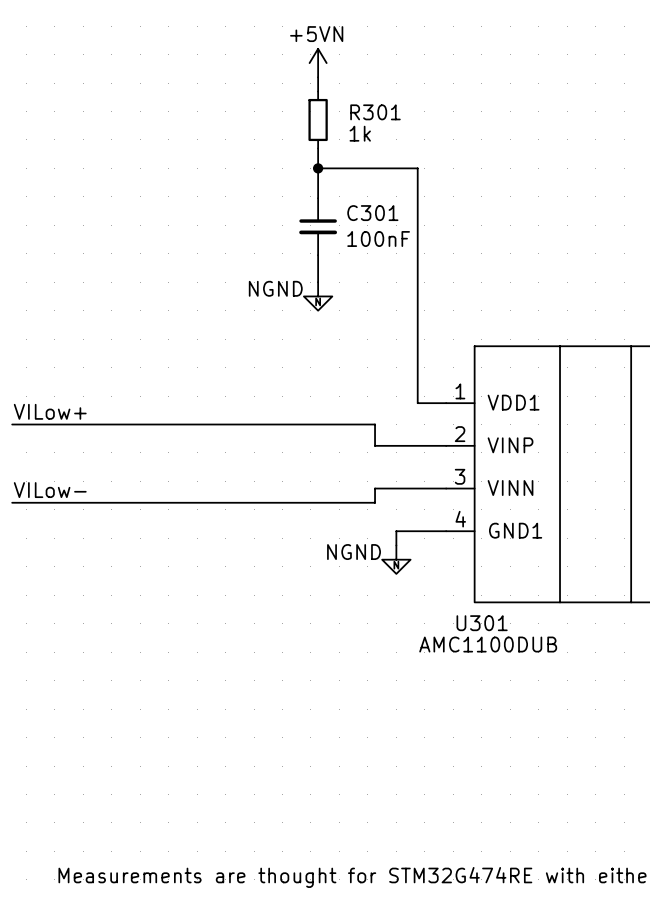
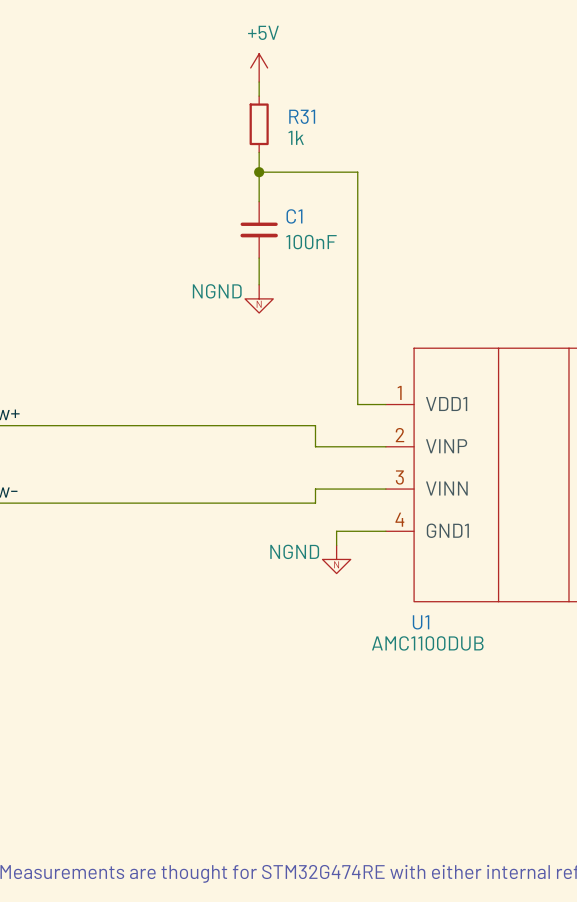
power symbol: +5VN (318, 63) -> +5V (259, 67)
R301 name: R301 (375, 112) -> R31 (302, 116)
C301 name: C301 (372, 213) -> C1 (294, 216)
U301 name: U301 (482, 623) -> U1 (421, 622)

